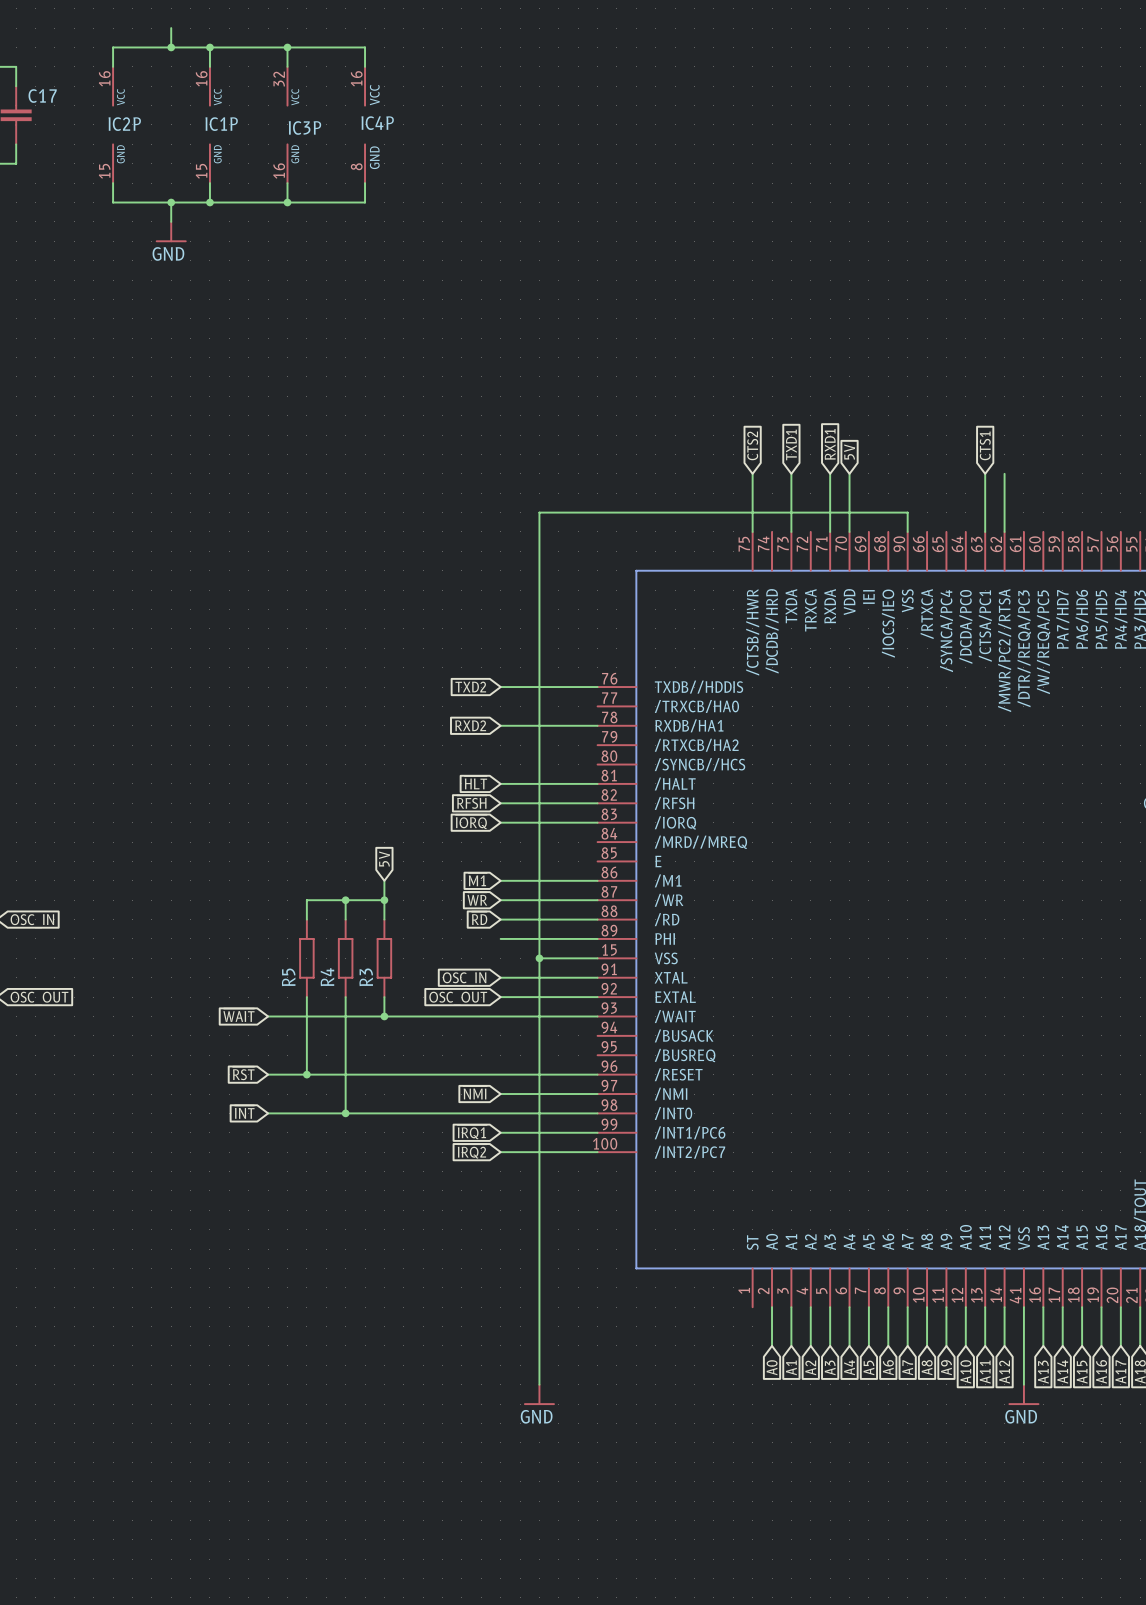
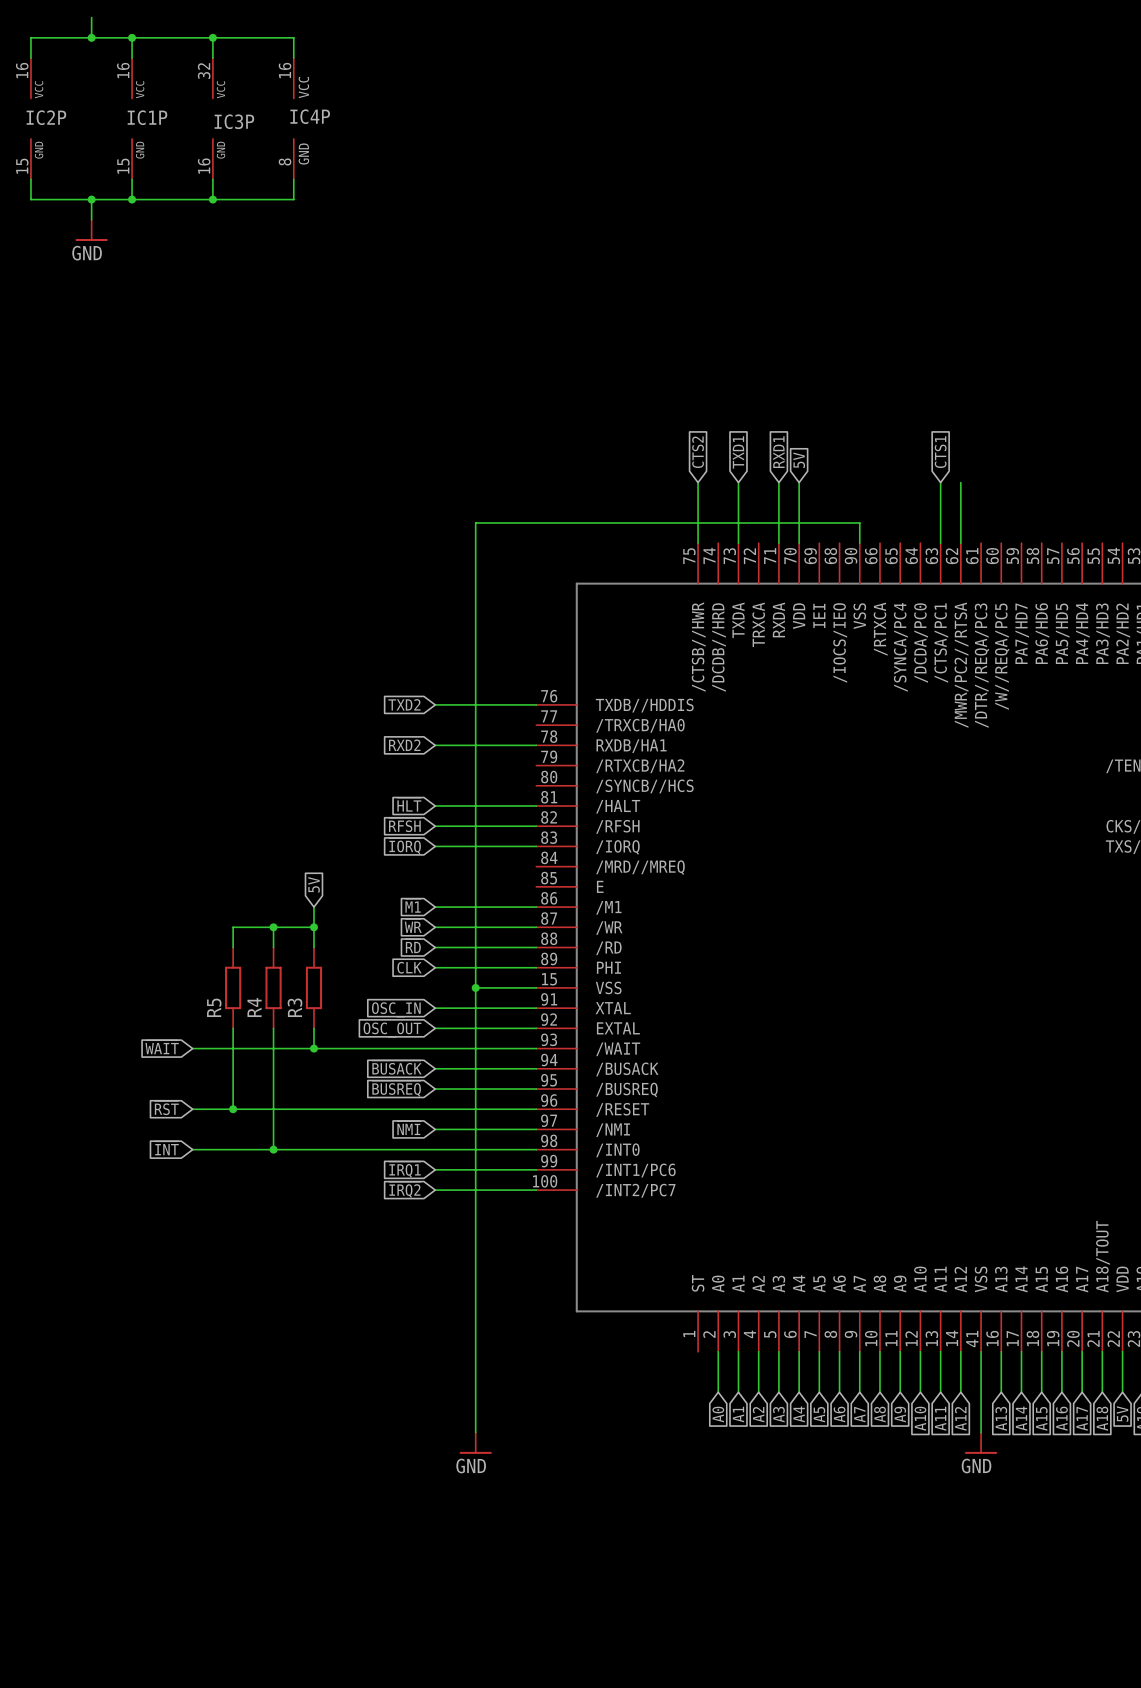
global label: none -> CLK (409, 967)
global label: none -> ~{BUSACK} (396, 1067)
wire: none -> (435, 1068) (536, 1068)
global label: none -> ~{BUSREQ} (396, 1088)
wire: none -> (435, 1089) (536, 1089)

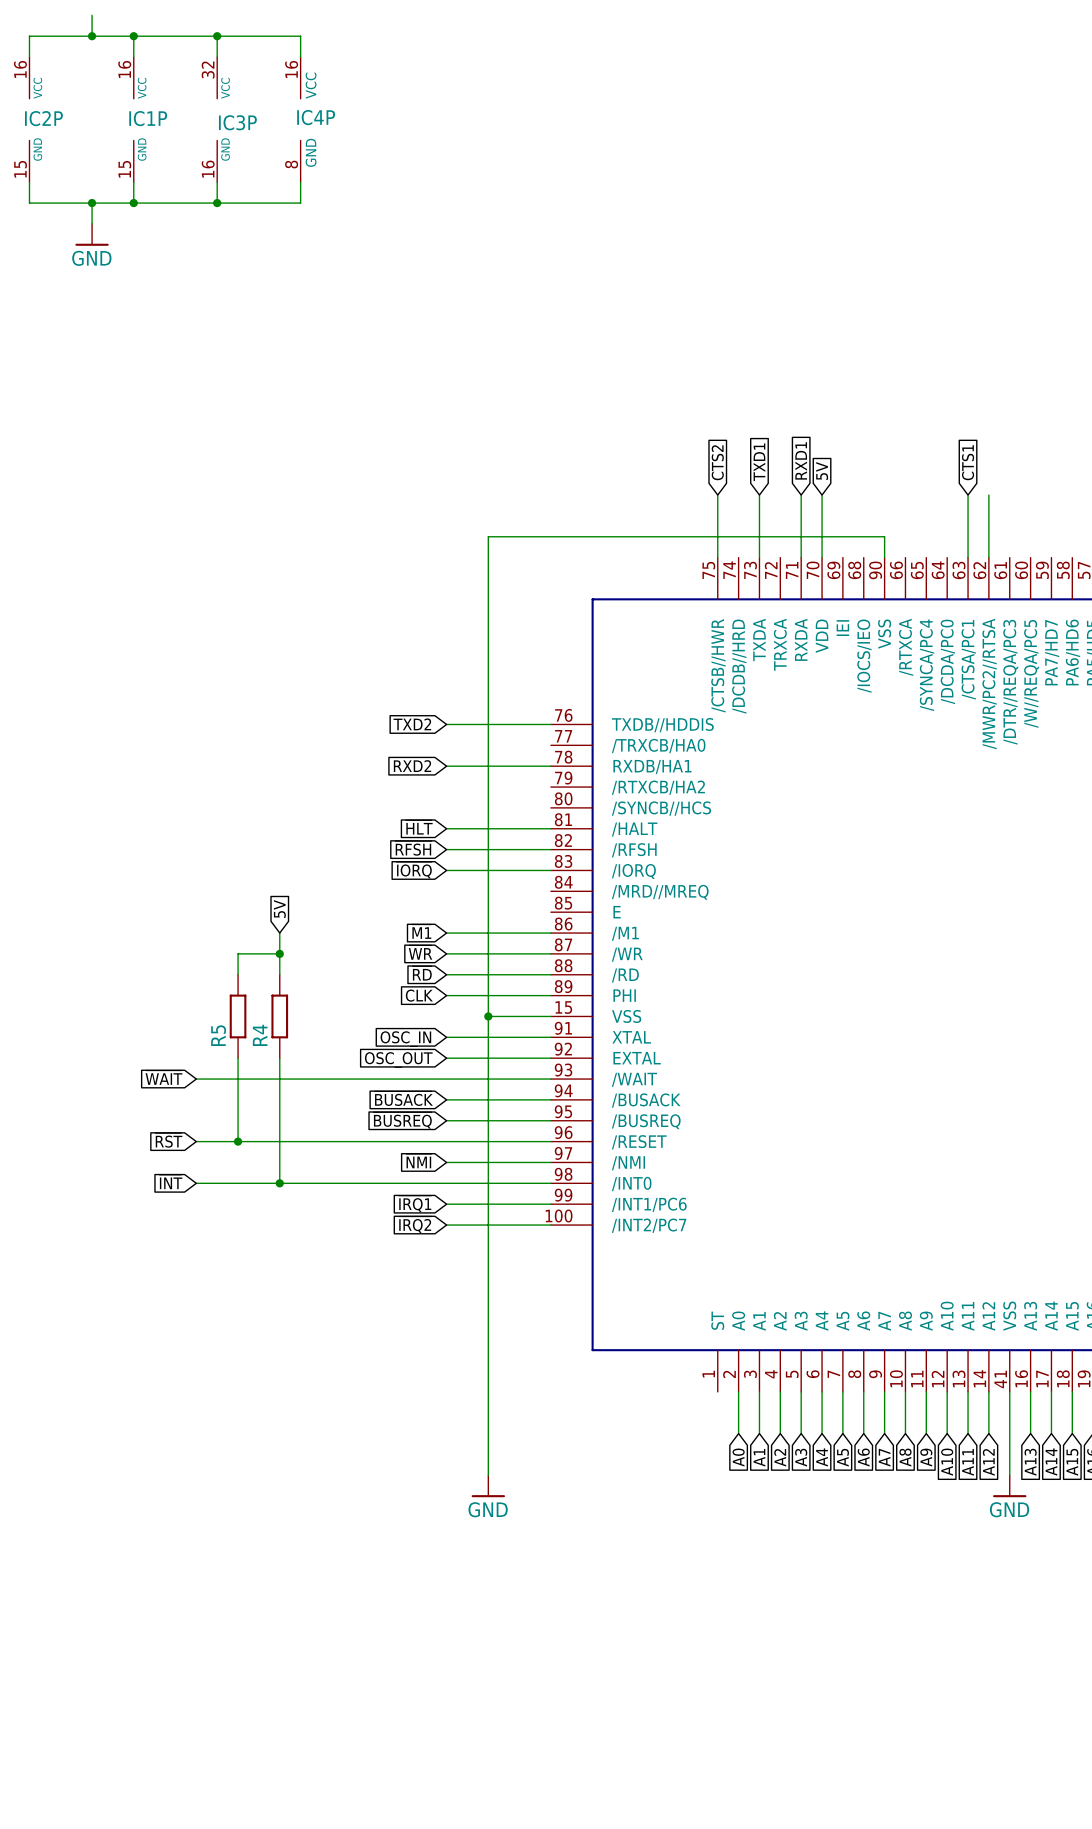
global label position: 5V (314, 884) -> 5V (279, 909)
wire: (313, 907) (313, 947) -> none
wire: (273, 927) (313, 927) -> (279, 953) (279, 933)
junction: (313, 927) -> none
R3: (313, 987) -> none
wire: (313, 1028) (313, 1048) -> none
junction: (313, 1048) -> none

